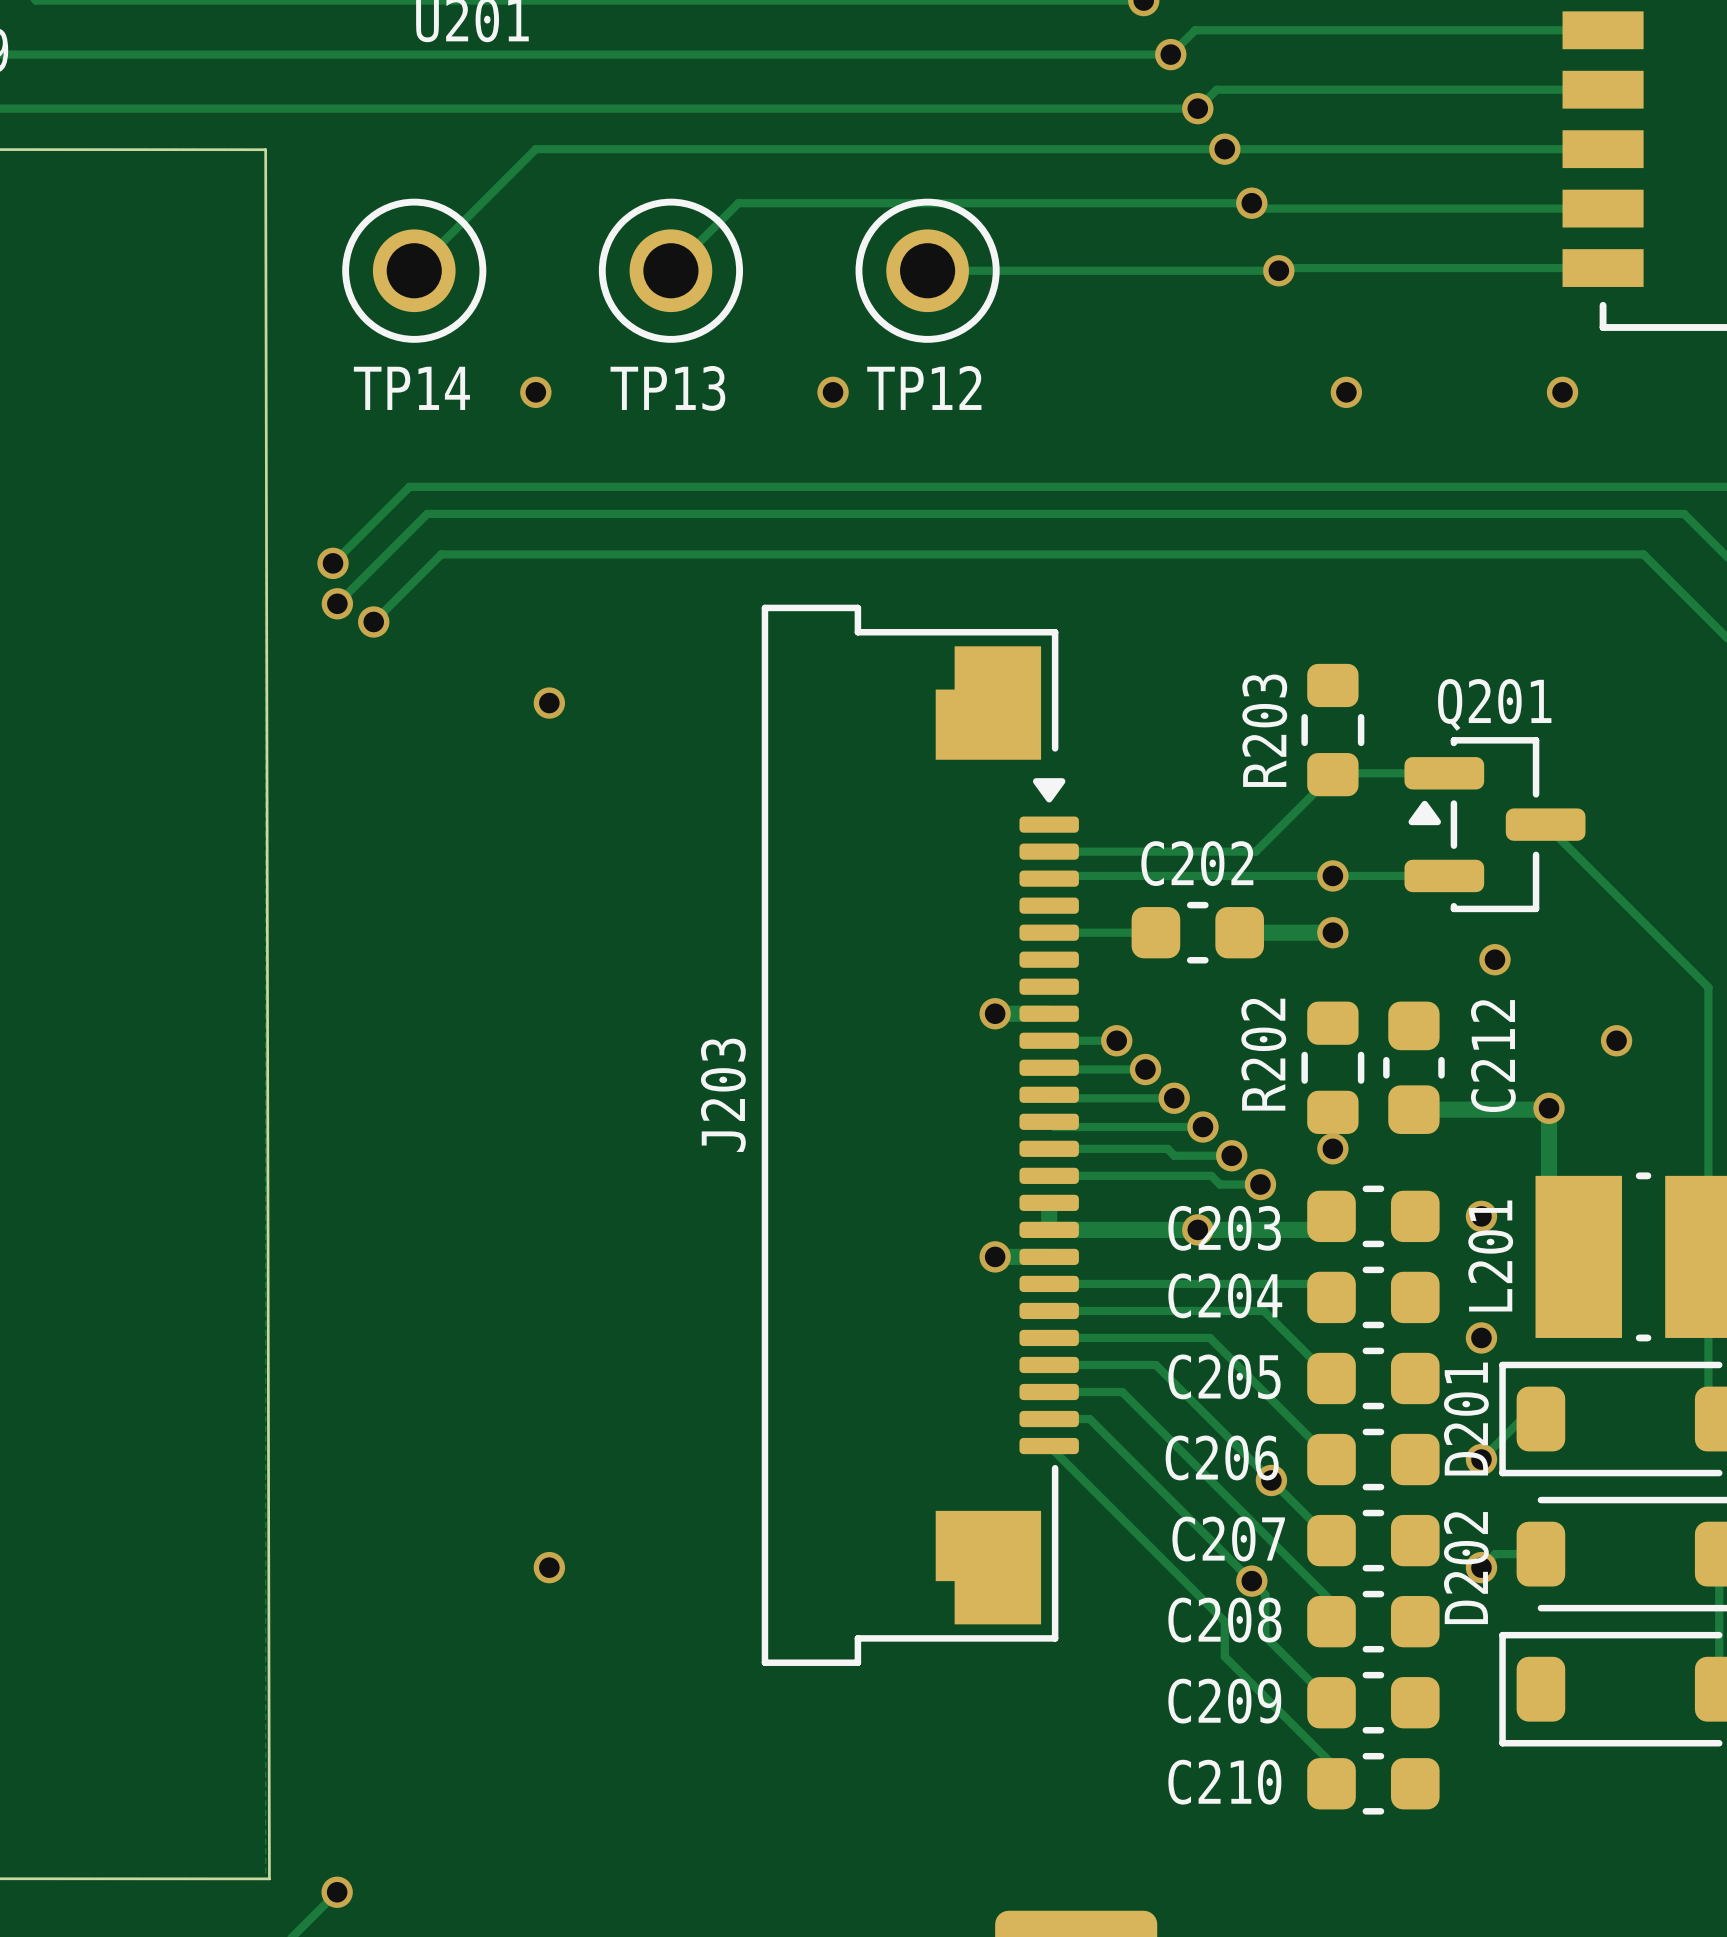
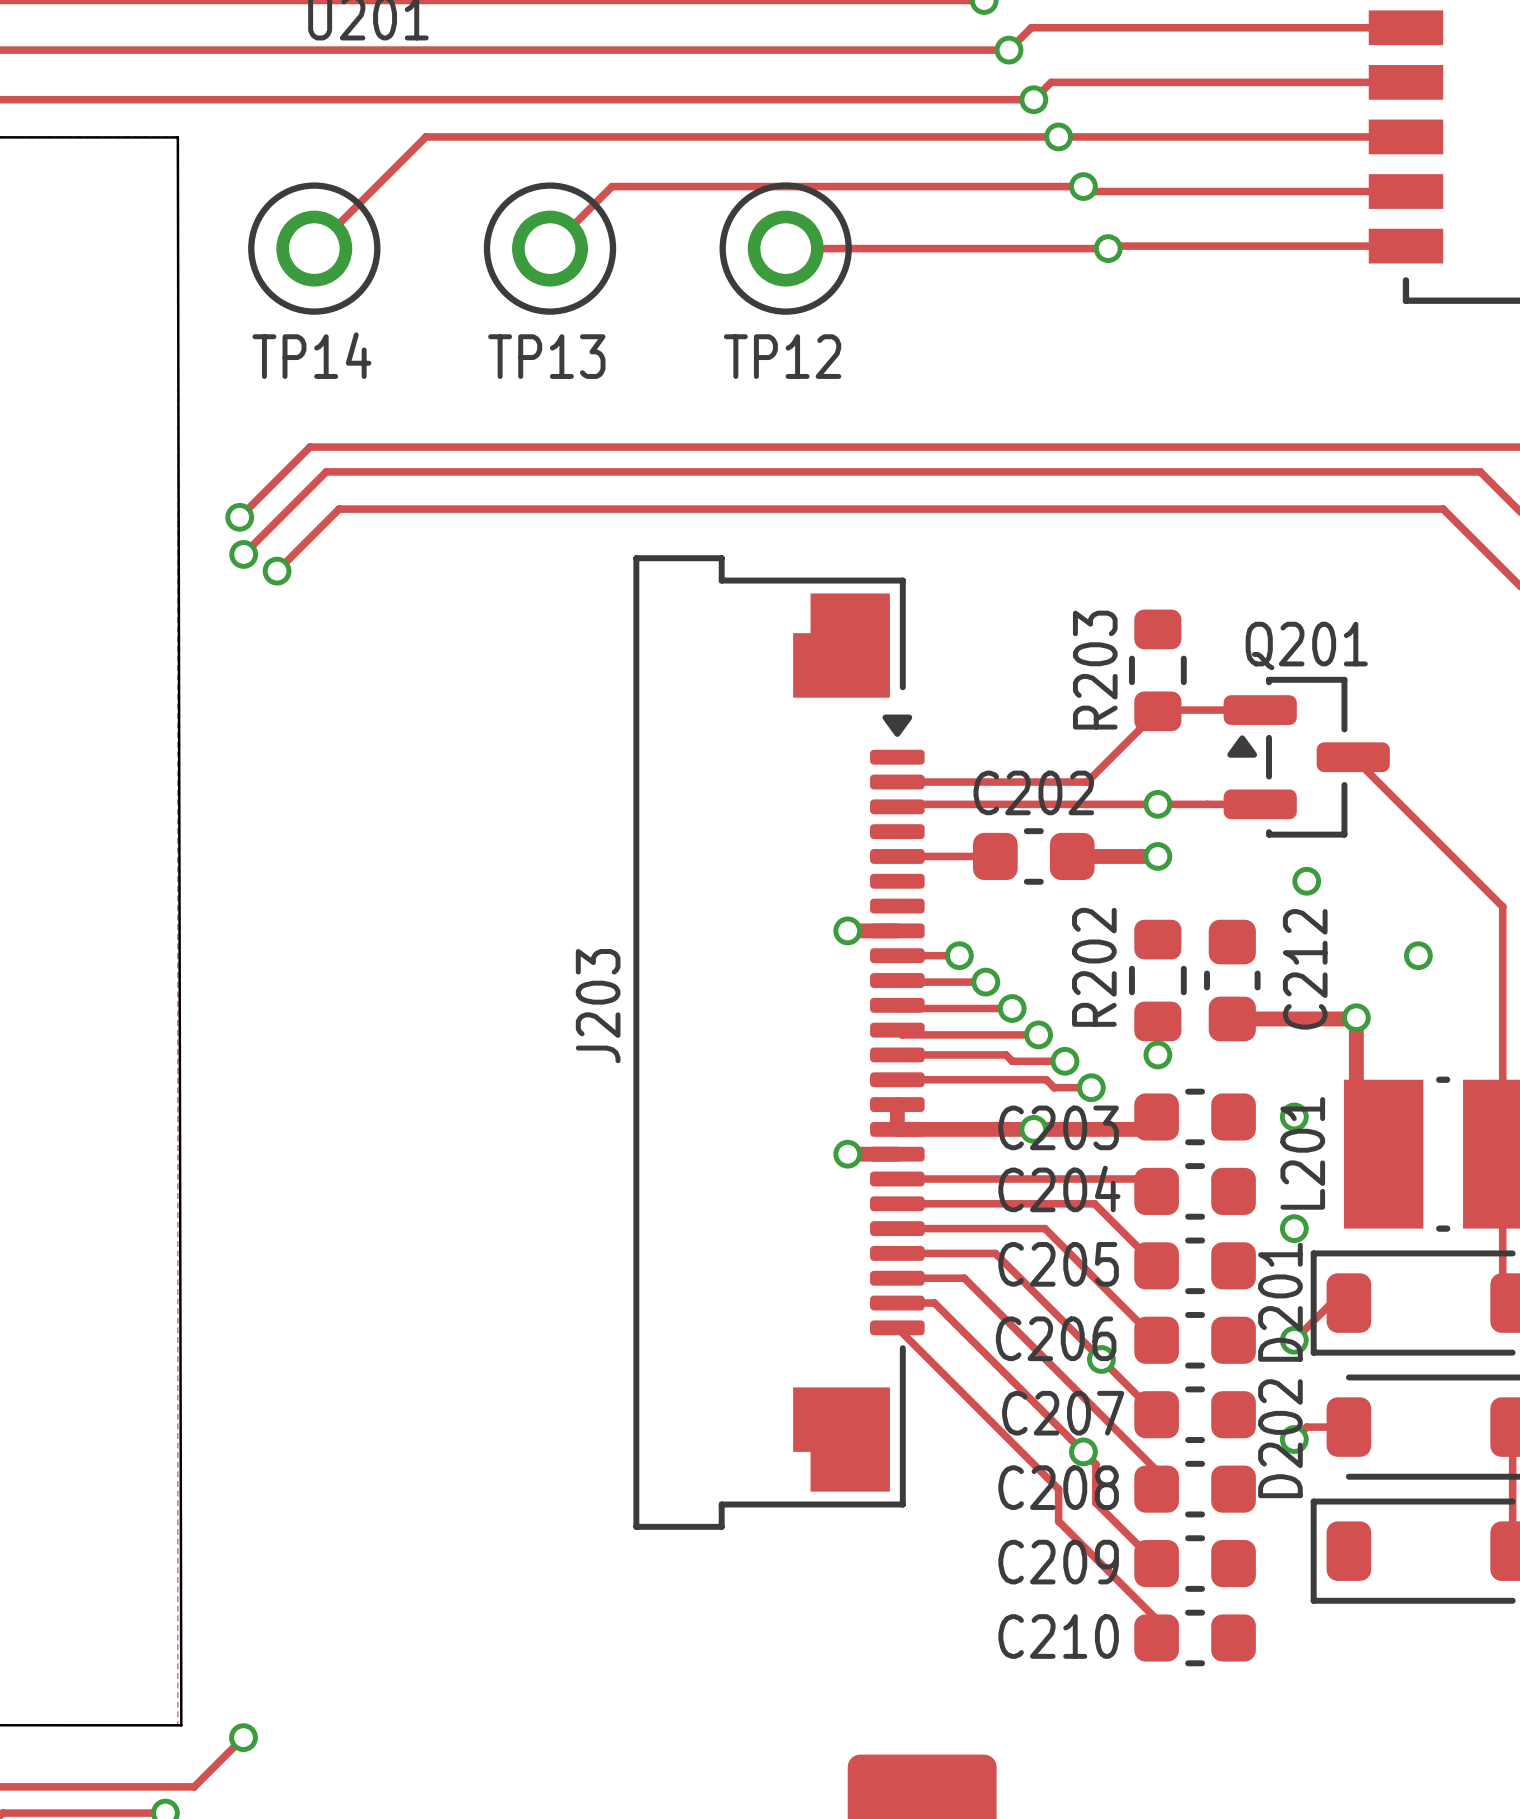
via: (535, 392) -> none
via: (833, 392) -> none
via: (1346, 392) -> none
via: (1562, 392) -> none
via: (549, 703) -> none
via: (549, 1567) -> none

